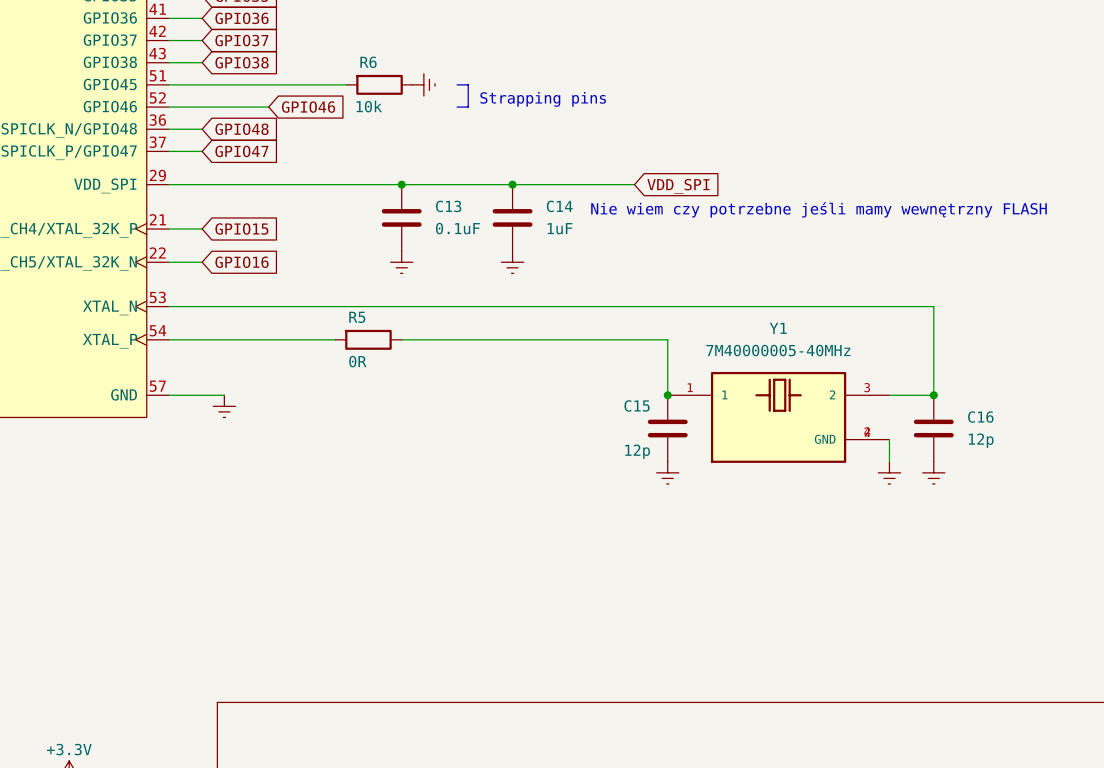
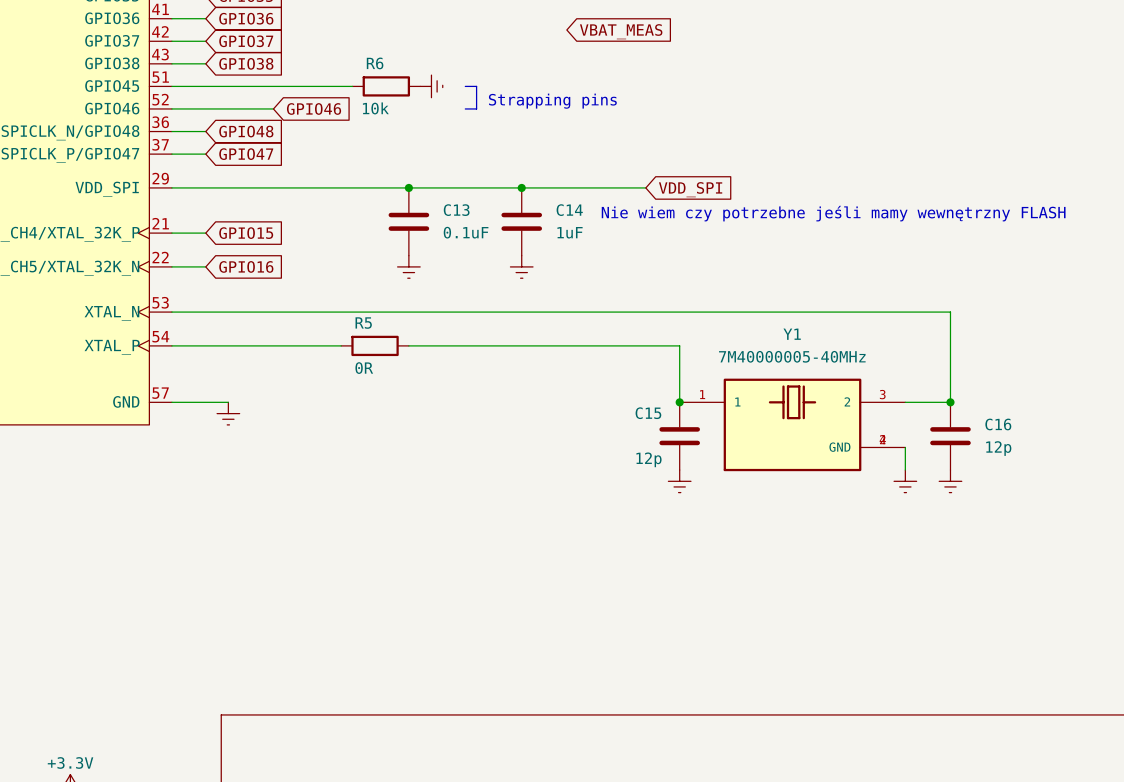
global label: none -> VBAT_MEAS (621, 31)

